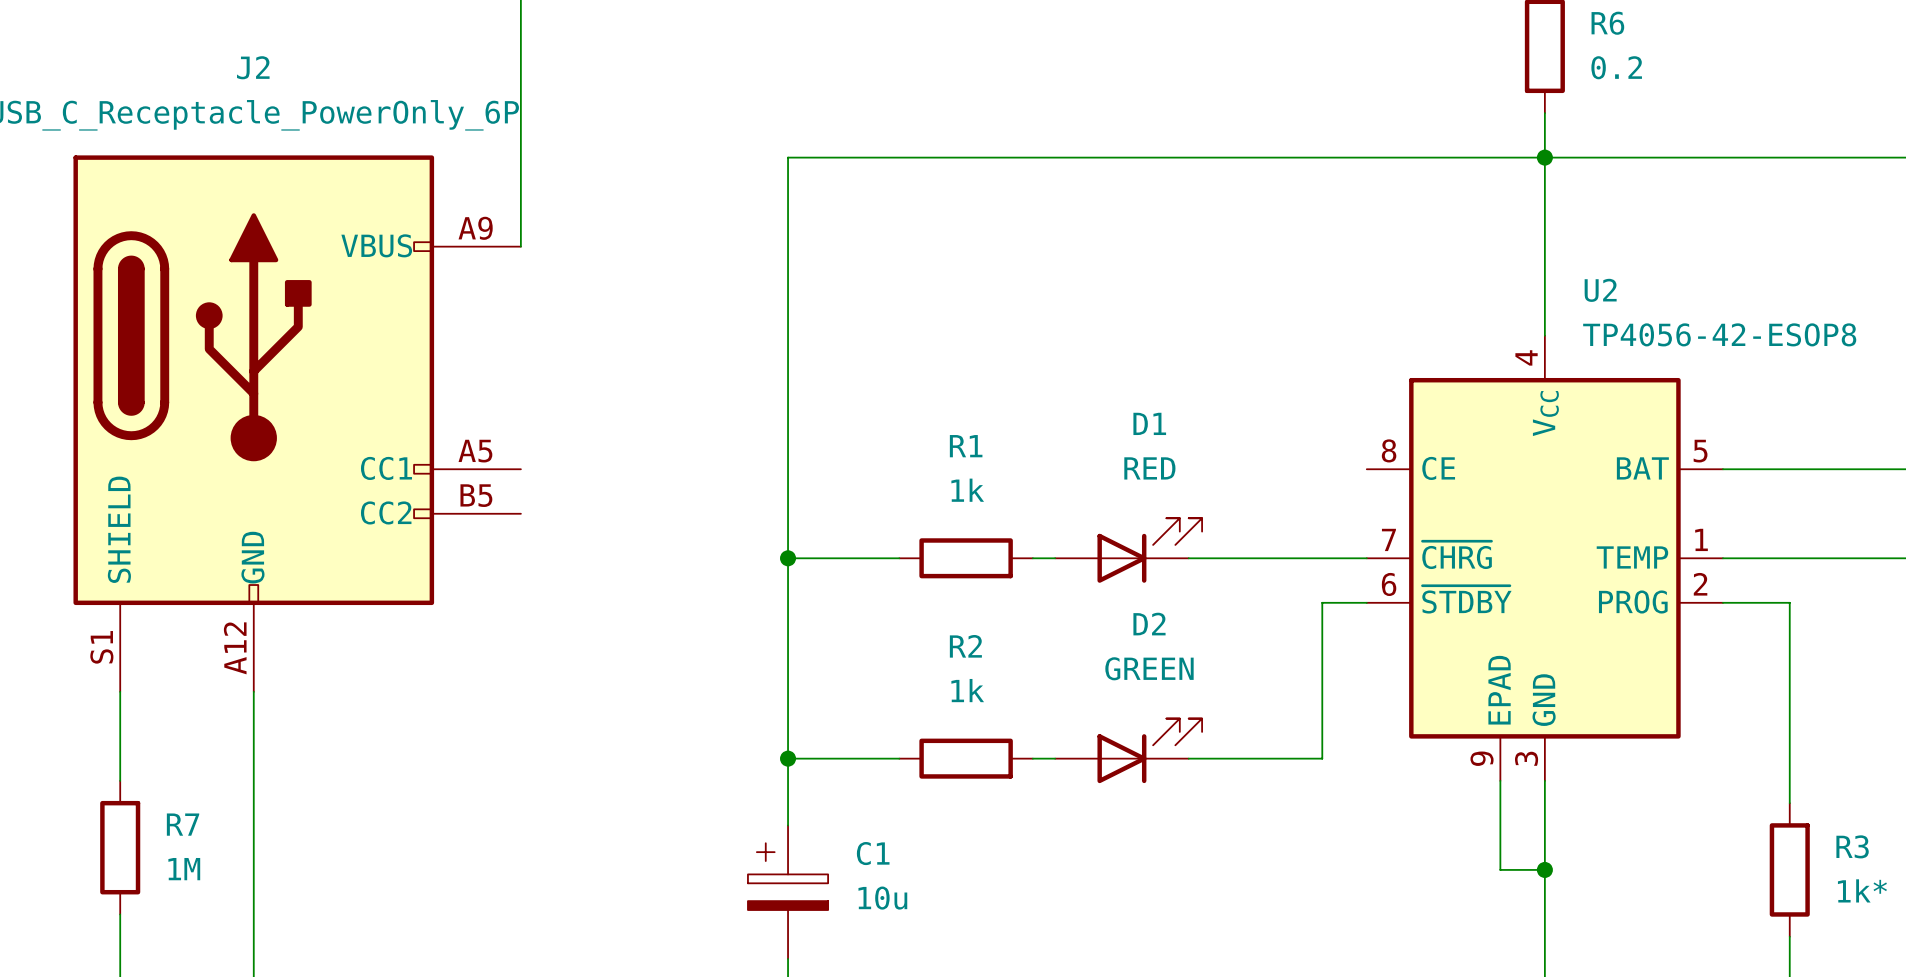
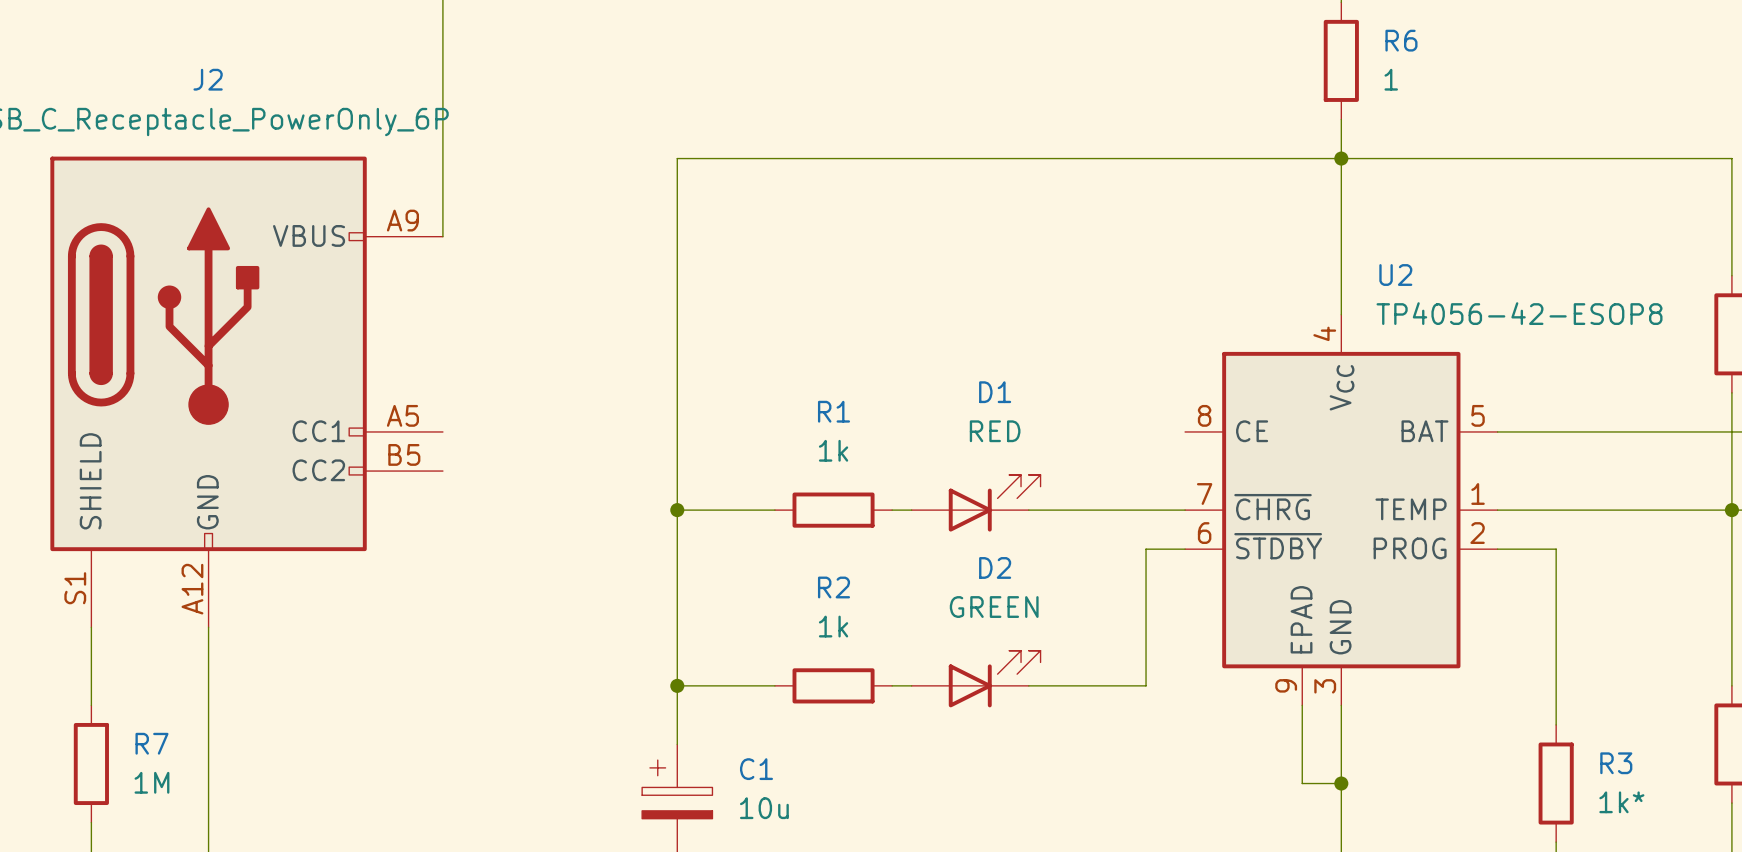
R6 value: 0.2 (1616, 67) -> 1 (1391, 79)

